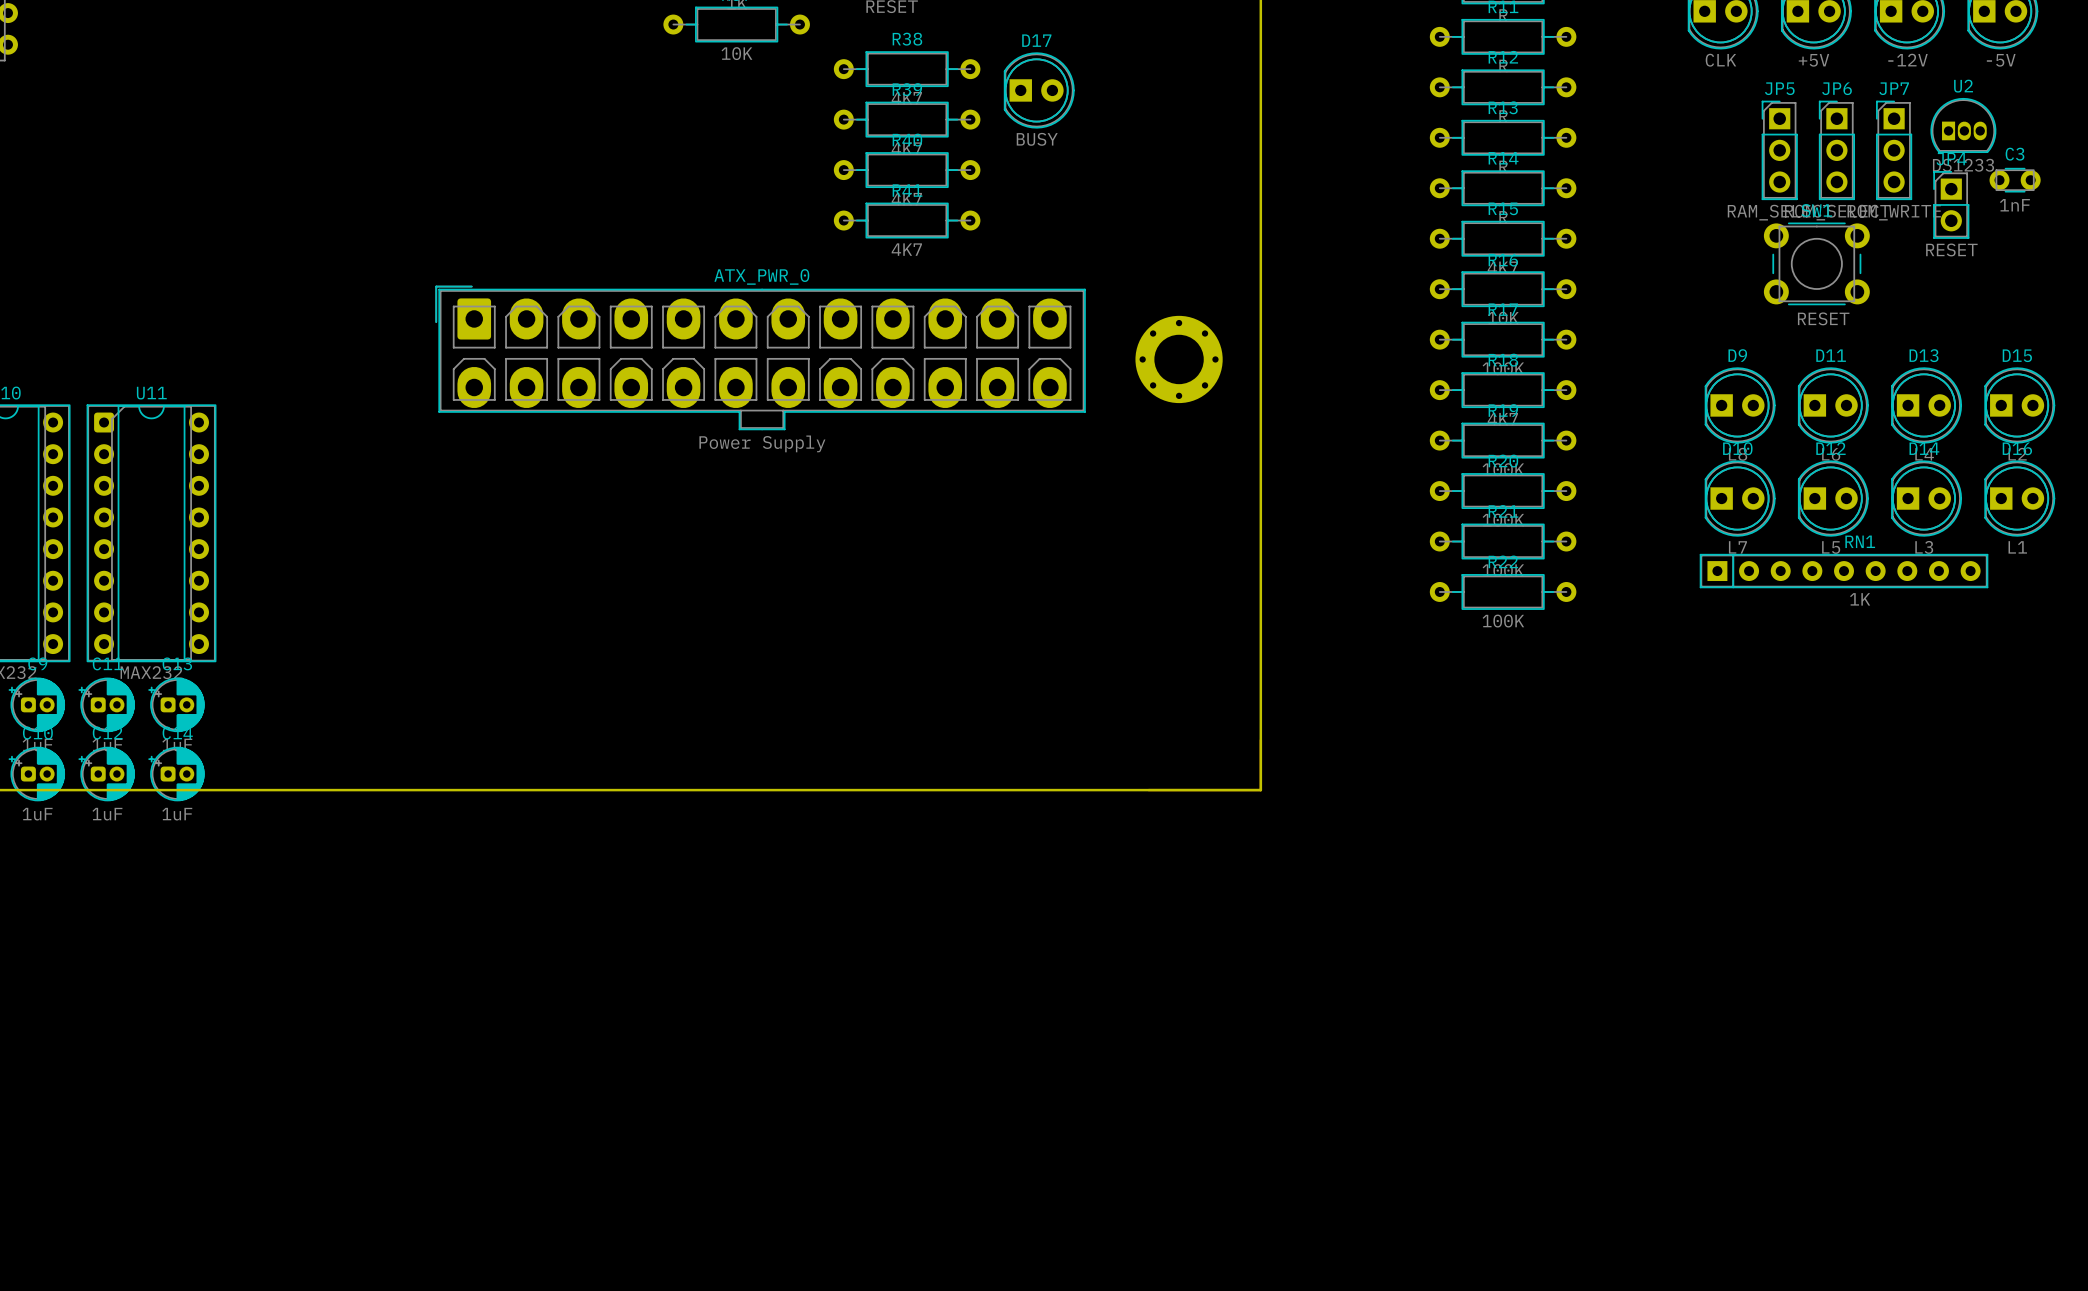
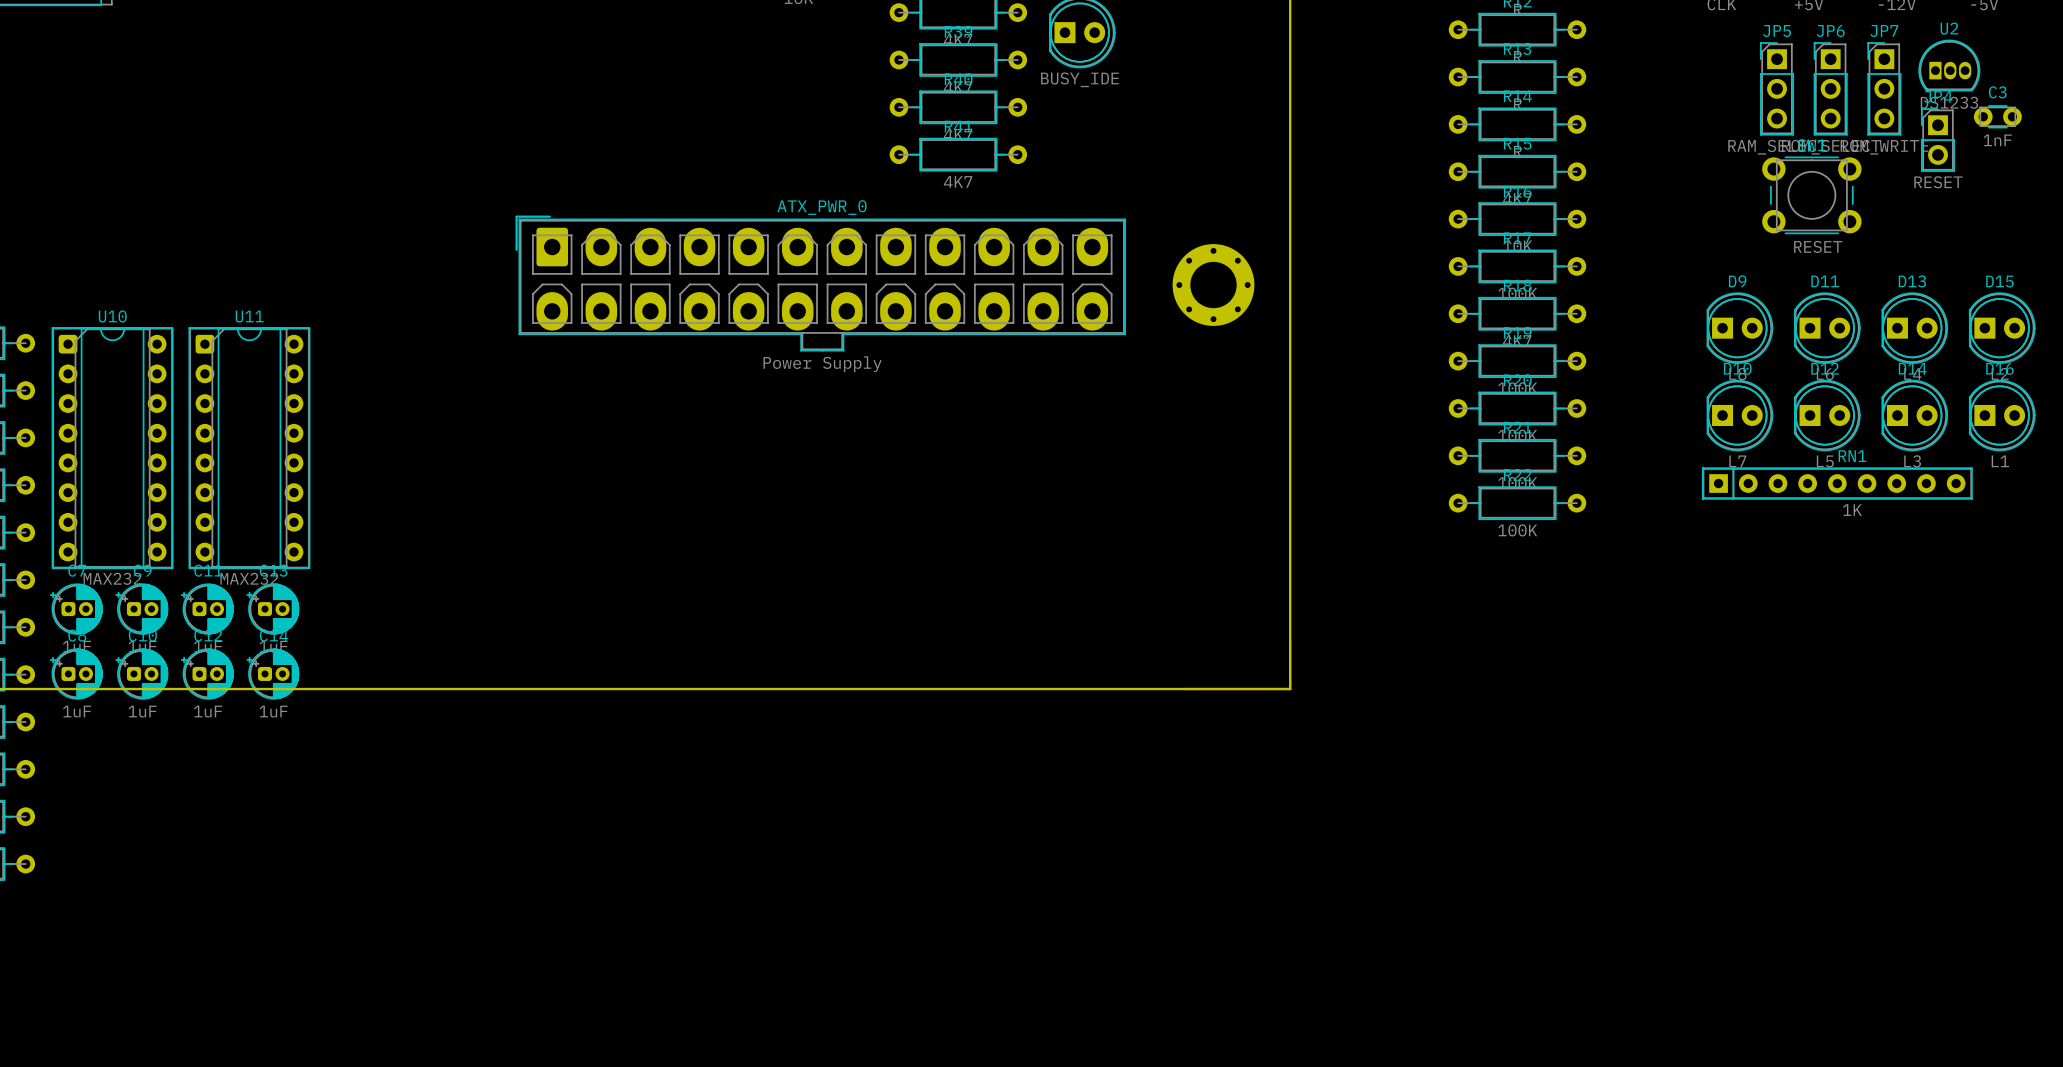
D17 value: BUSY (1037, 139) -> BUSY_IDE (1079, 79)

